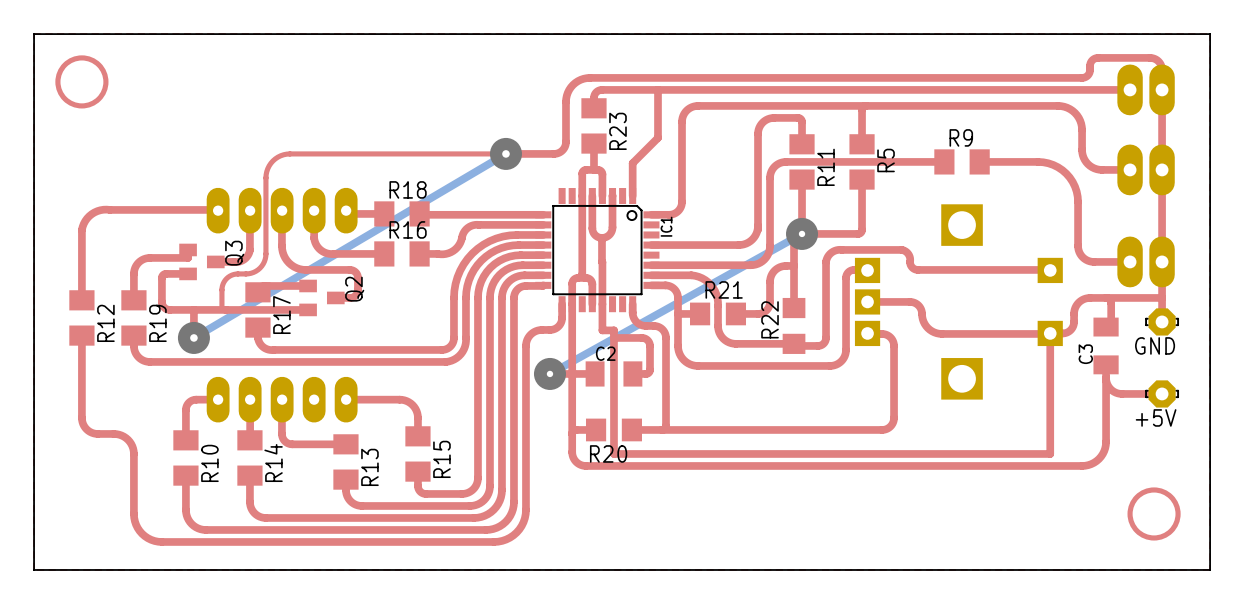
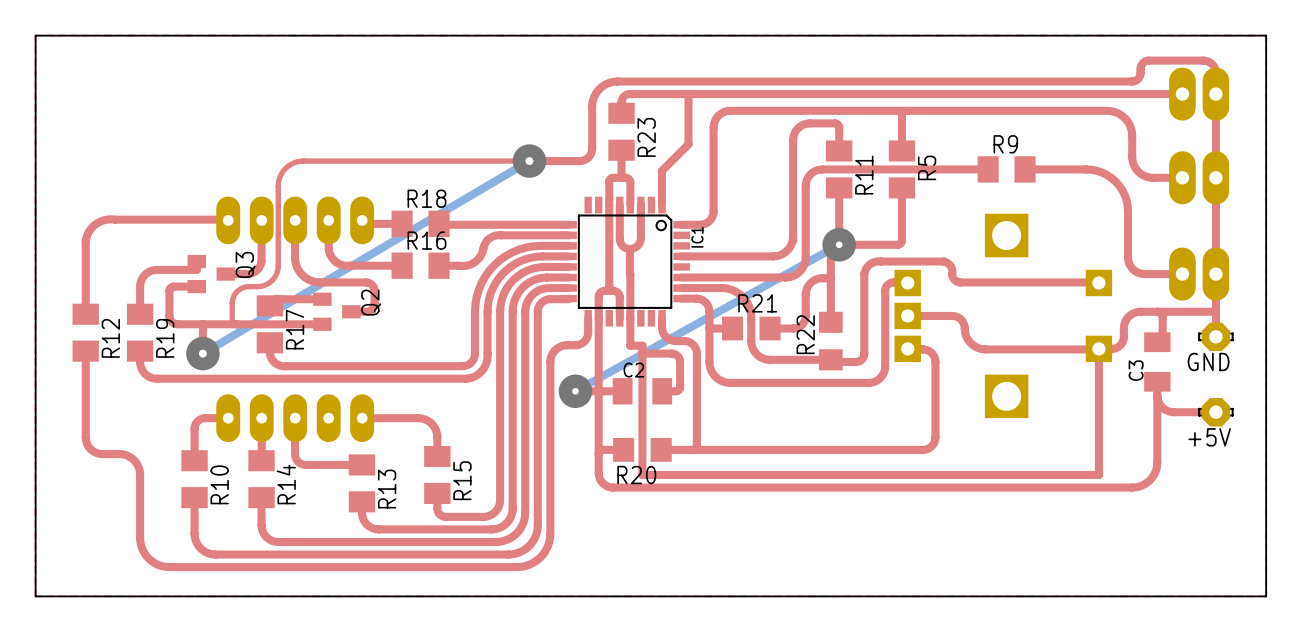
drawing: [55, 55, 109, 109] -> none
drawing: [1127, 487, 1181, 541] -> none

